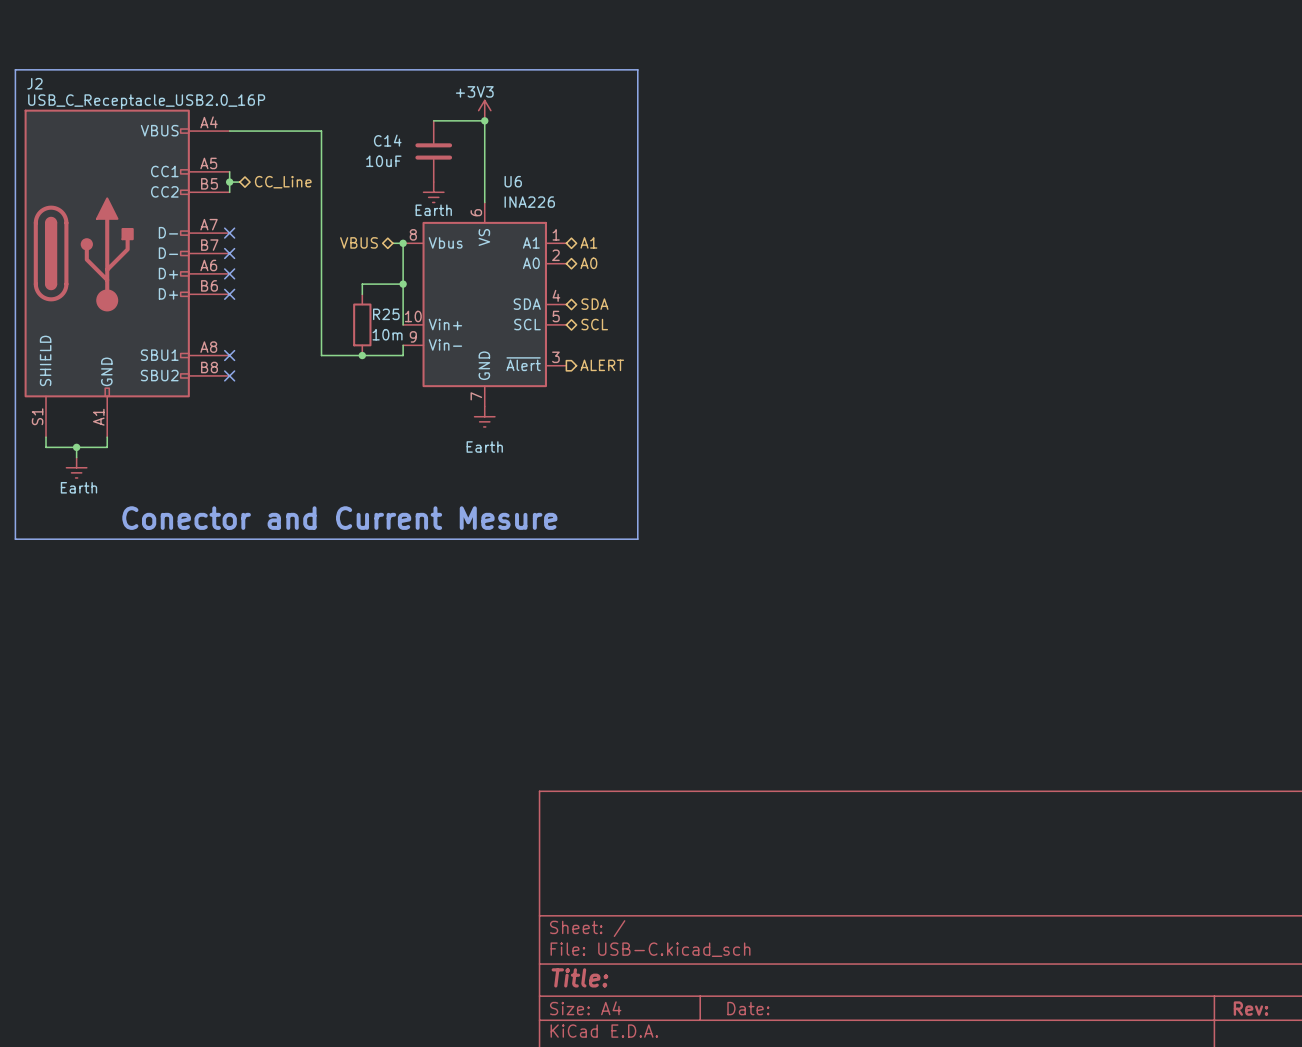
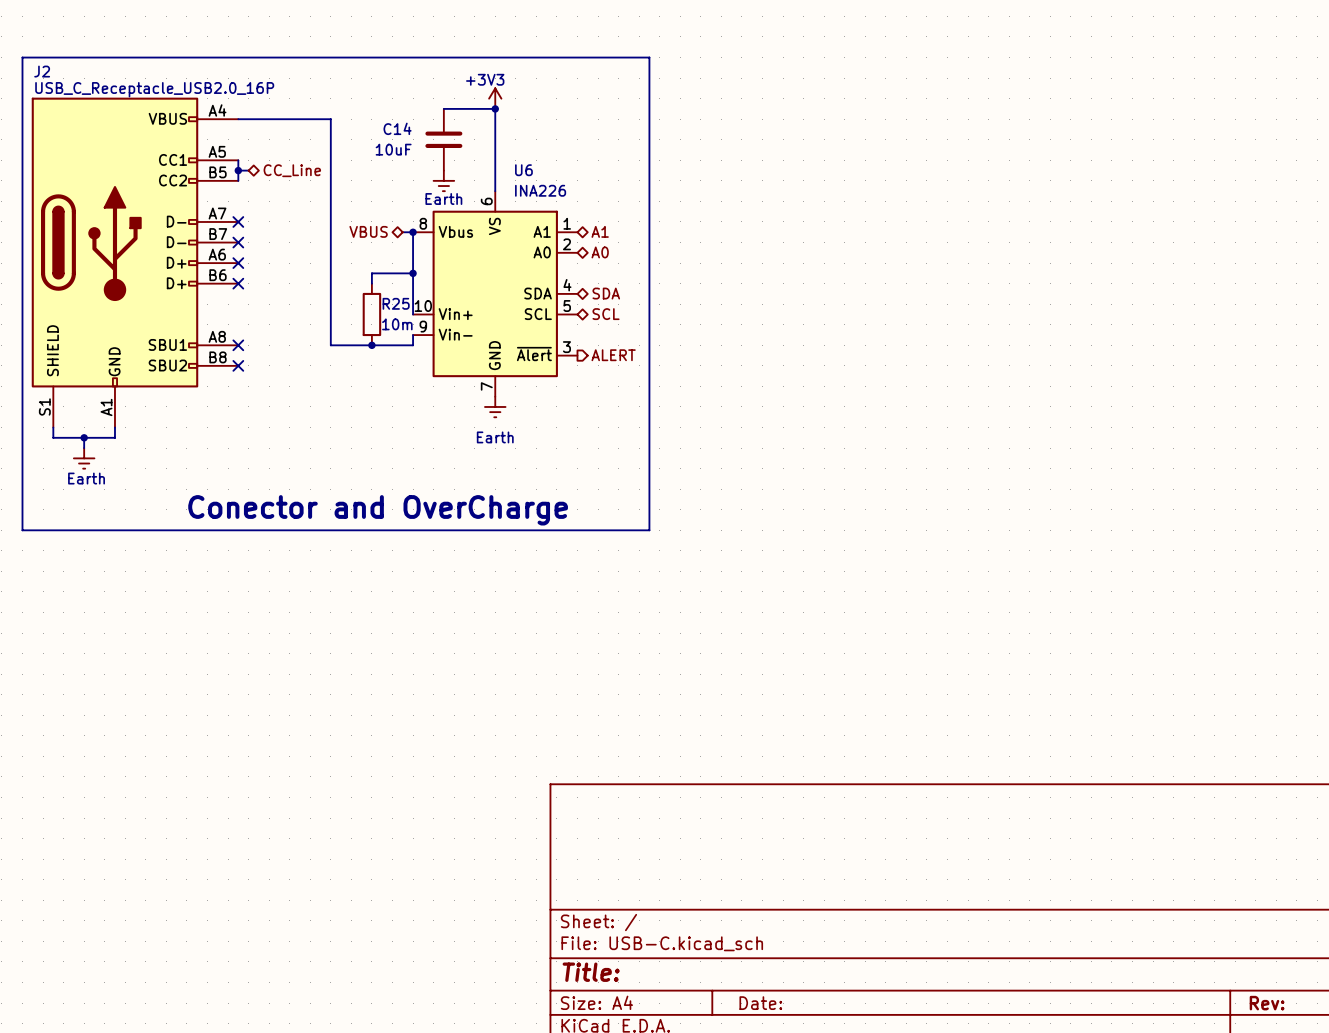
text: Conector and Current Mesure (339, 518) -> Conector and OverCharge (378, 510)

